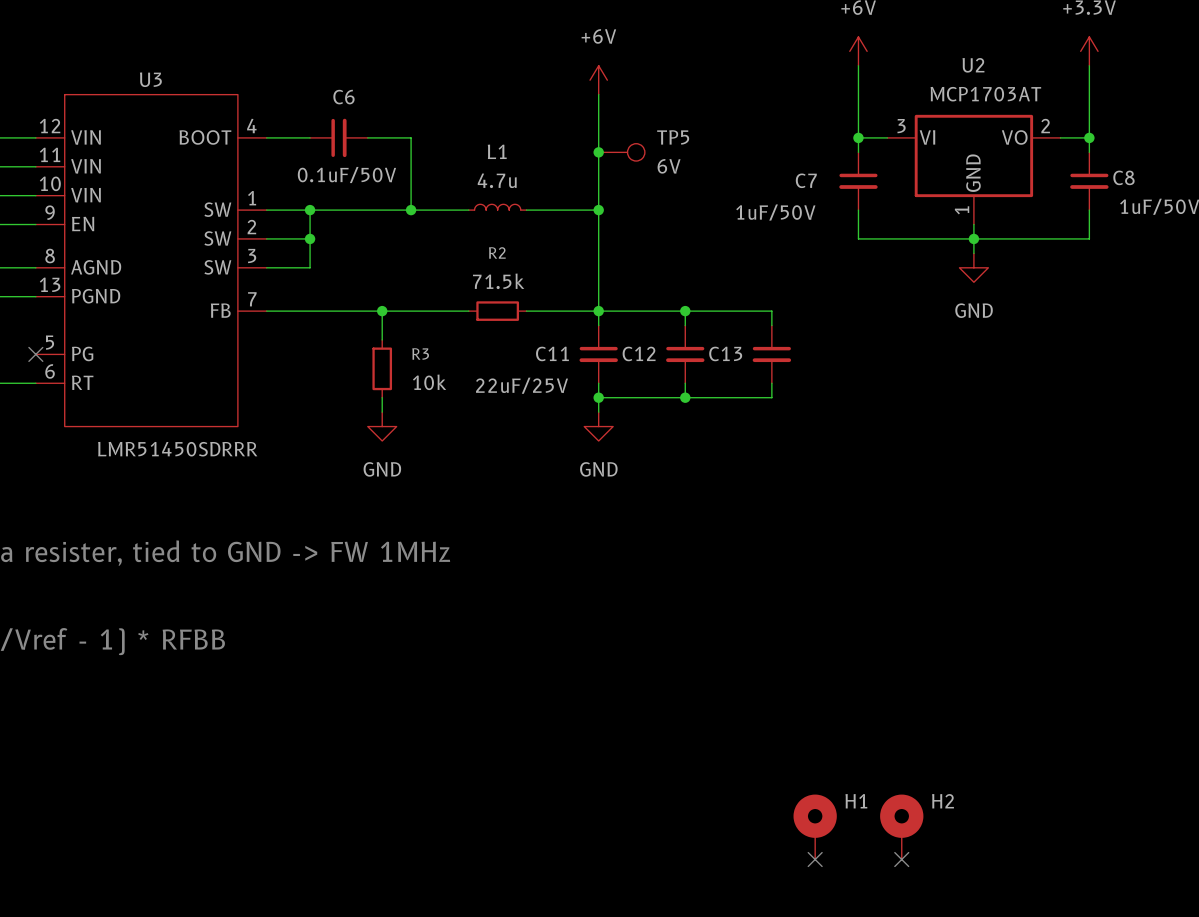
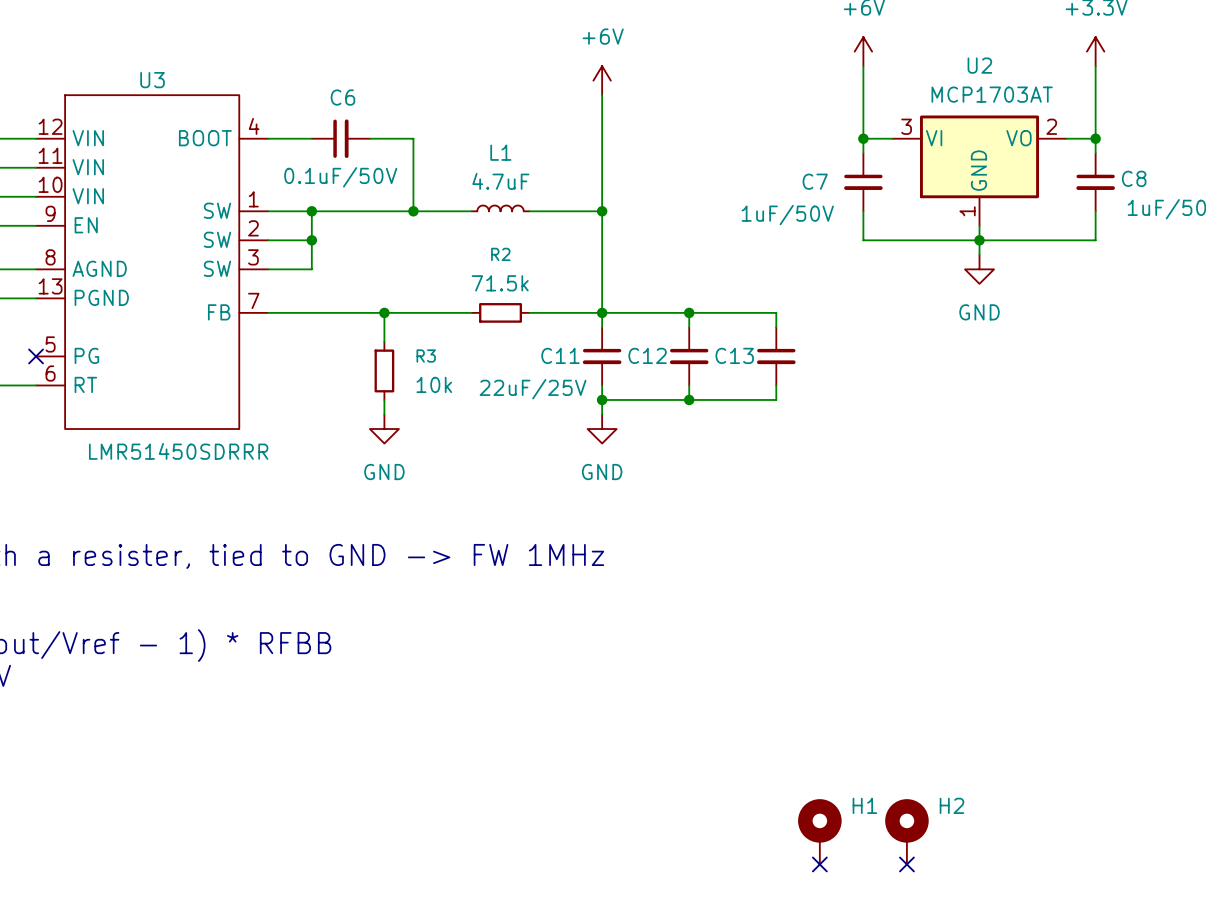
junction: (598, 152) -> none
TP5: 6V (621, 152) -> none
L1 value: 4.7u (497, 180) -> 4.7uF (500, 181)

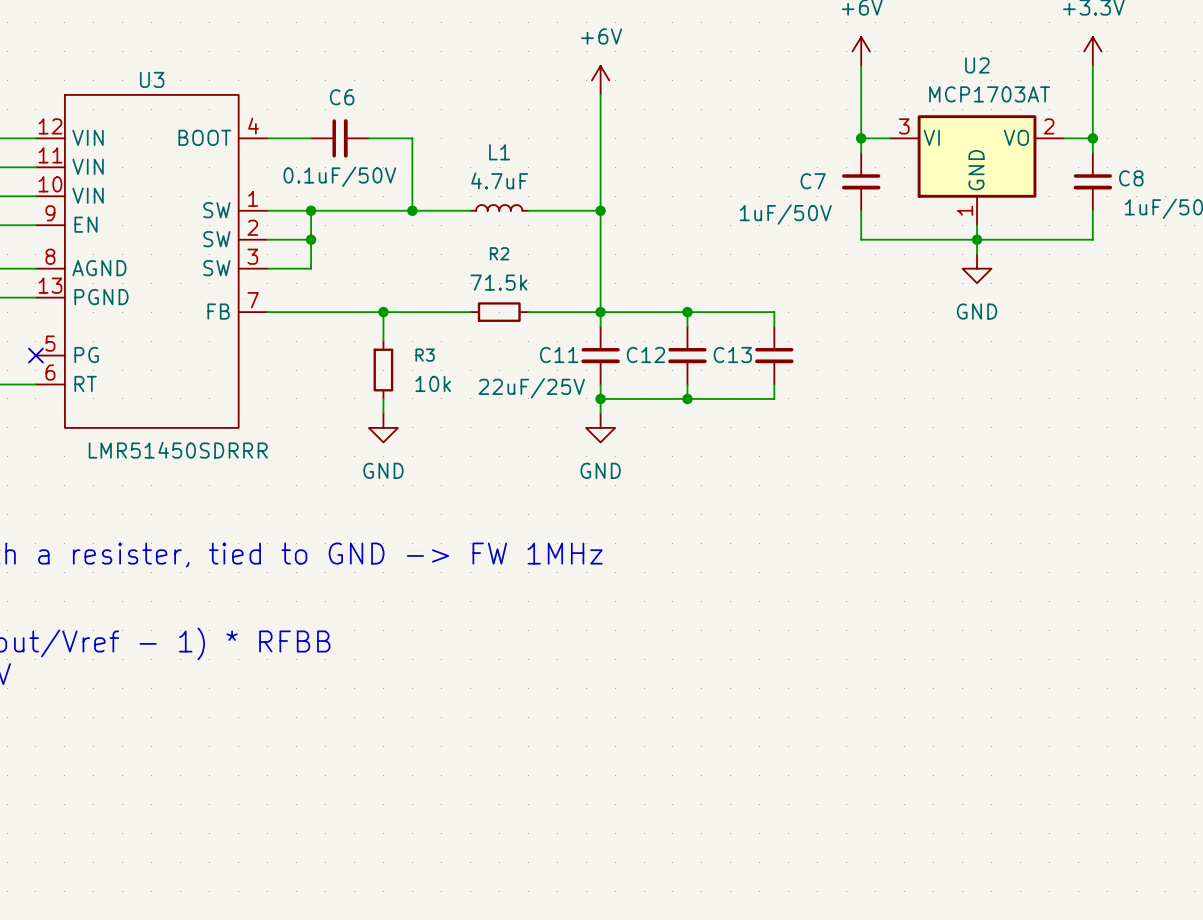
H1: (819, 831) -> none
H2: (906, 831) -> none
no-connect mark: (819, 864) -> none
no-connect mark: (906, 864) -> none

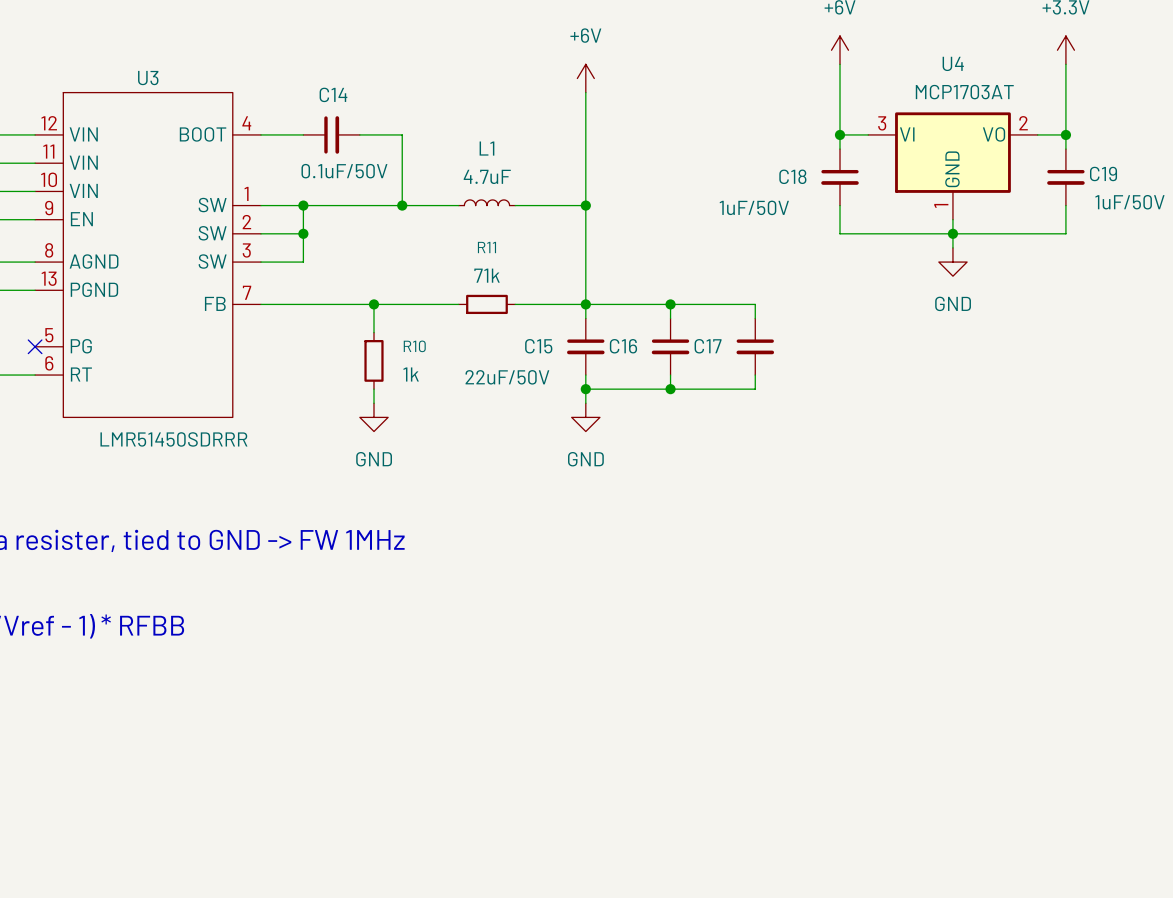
U2 name: U2 (977, 65) -> U4 (953, 63)
C6 name: C6 (342, 97) -> C14 (333, 94)
C8 name: C8 (1131, 178) -> C19 (1103, 173)
C7 name: C7 (813, 181) -> C18 (792, 176)
R2 name: R2 (499, 253) -> R11 (486, 247)
R2 value: 71.5k (498, 282) -> 71k (487, 275)
R3 name: R3 (425, 355) -> R10 (414, 346)
C11 name: C11 (559, 355) -> C15 (538, 346)
C12 name: C12 (645, 355) -> C16 (623, 346)
C13 name: C13 (732, 355) -> C17 (708, 346)
R3 value: 10k (433, 383) -> 1k (411, 374)
C11 value: 22uF/25V (531, 388) -> 22uF/50V (507, 377)

